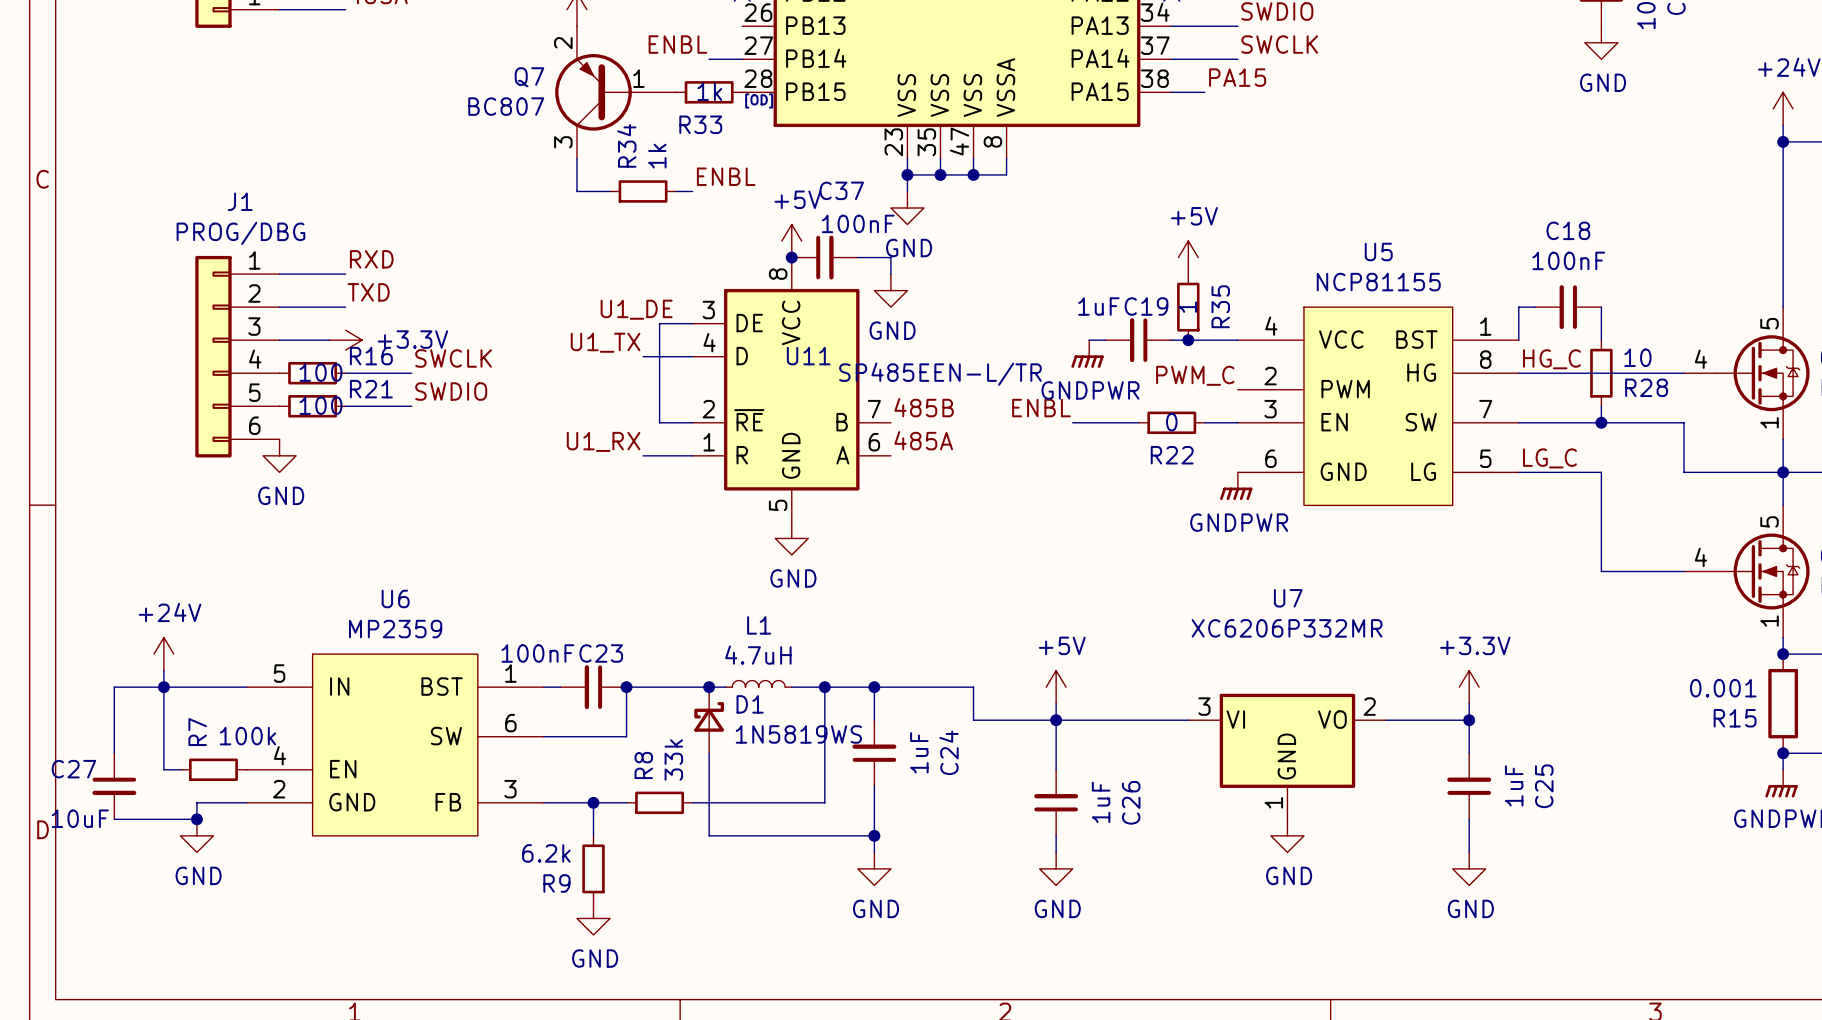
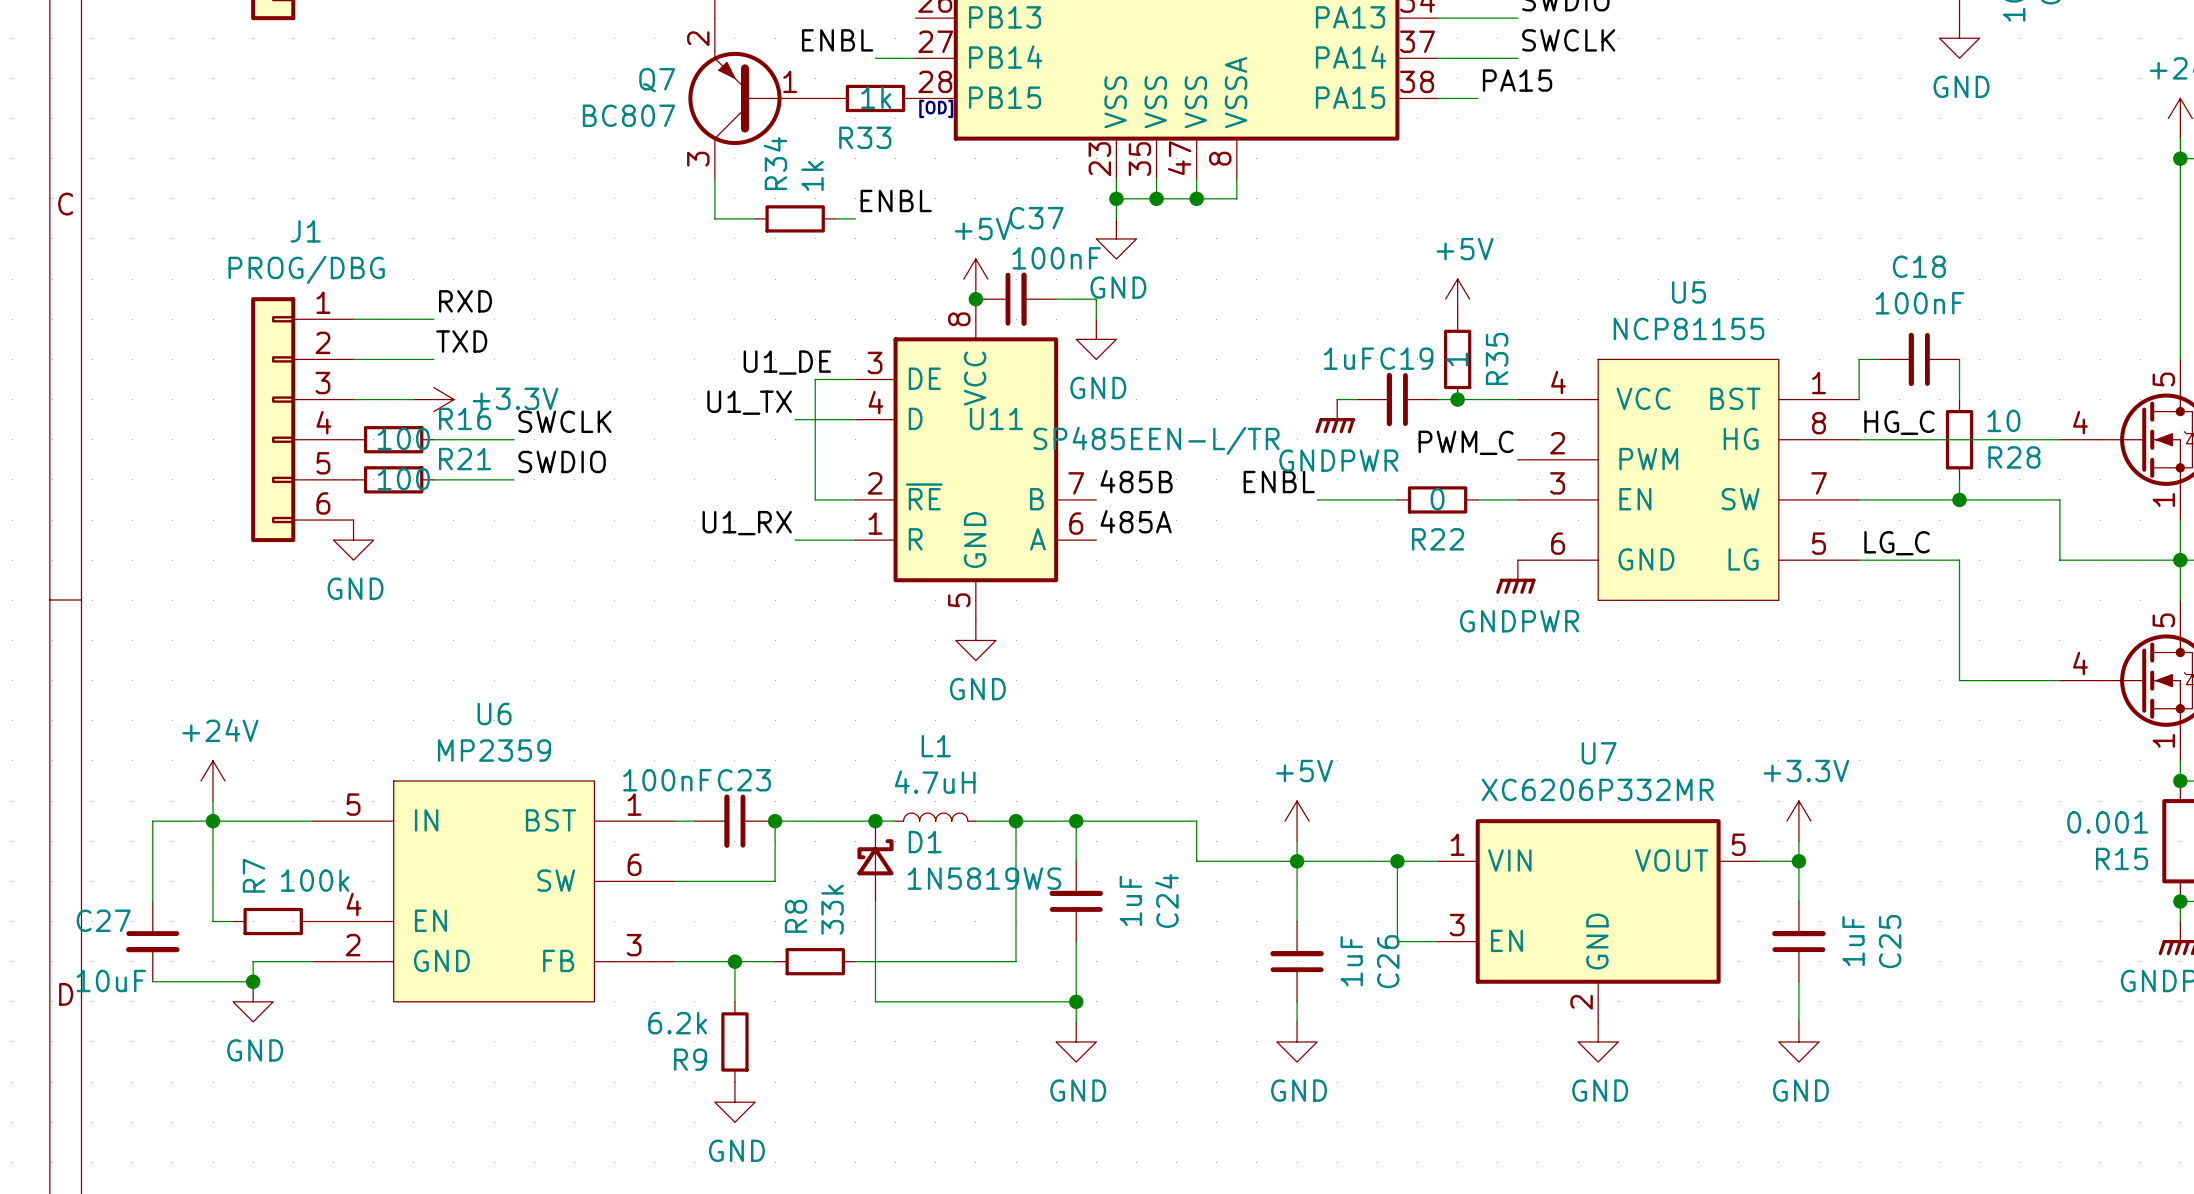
U7 symbol: [1188, 693, 1387, 820] -> [1437, 819, 1759, 1022]
wire: none -> (1397, 861) (1397, 941) (1437, 941)
junction: none -> (1397, 861)
power symbol position: GND (1287, 835) -> GND (1598, 1041)

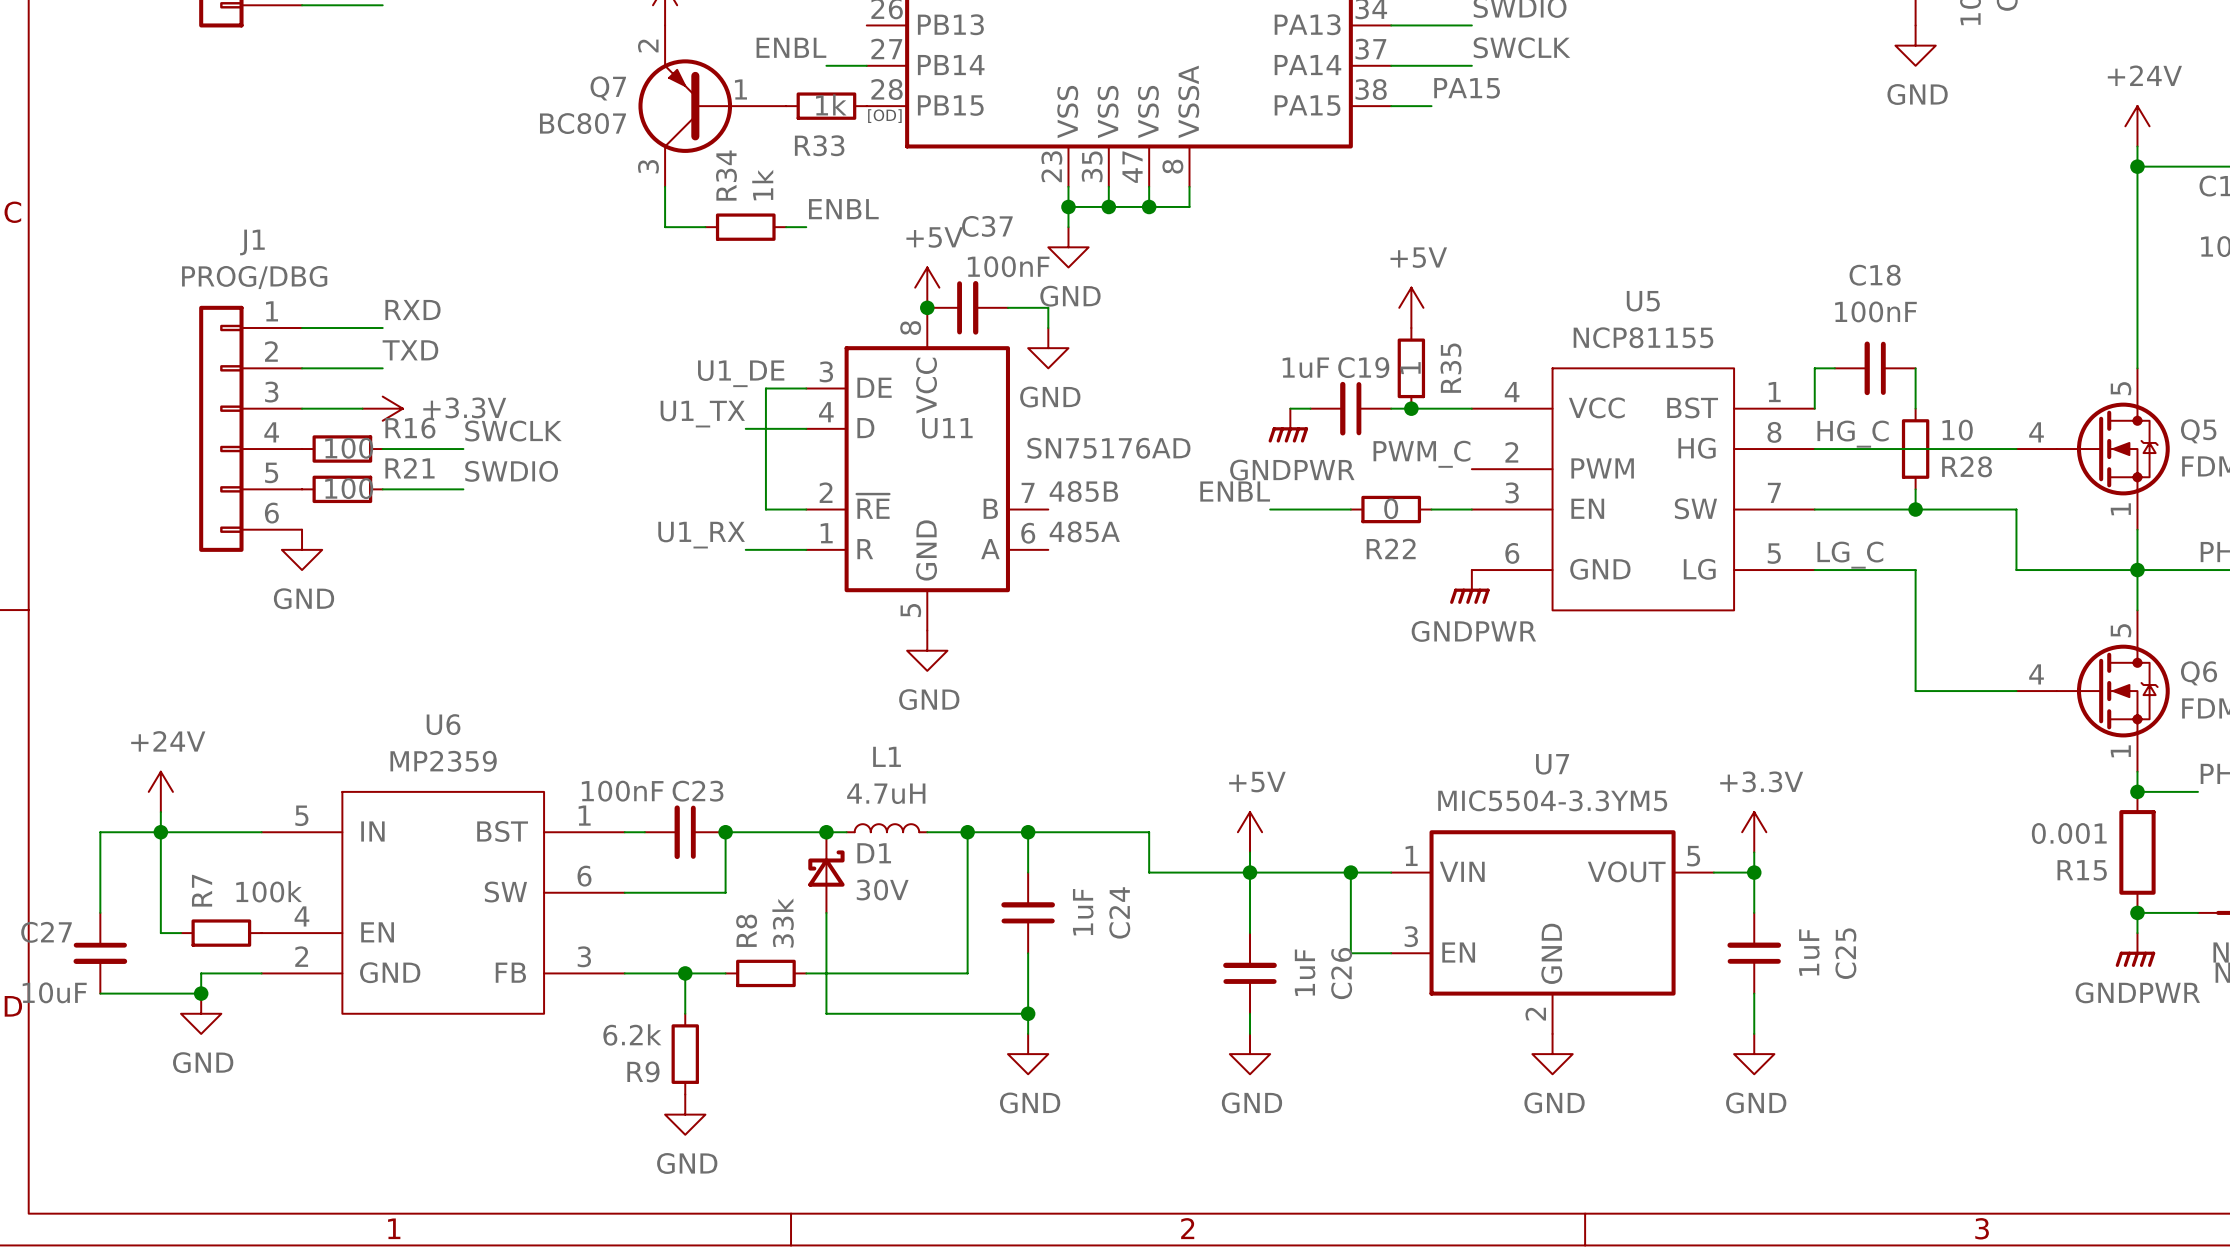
U11 value: SP485EEN-L/TR (1156, 440) -> SN75176AD (1108, 448)
U7 value: XC6206P332MR (1597, 789) -> MIC5504-3.3YM5 (1552, 800)
D1 value: 1N5819WS (984, 878) -> 30V (882, 889)

